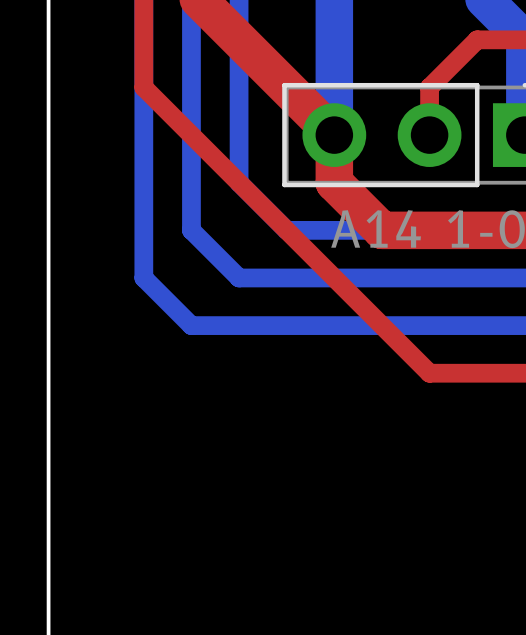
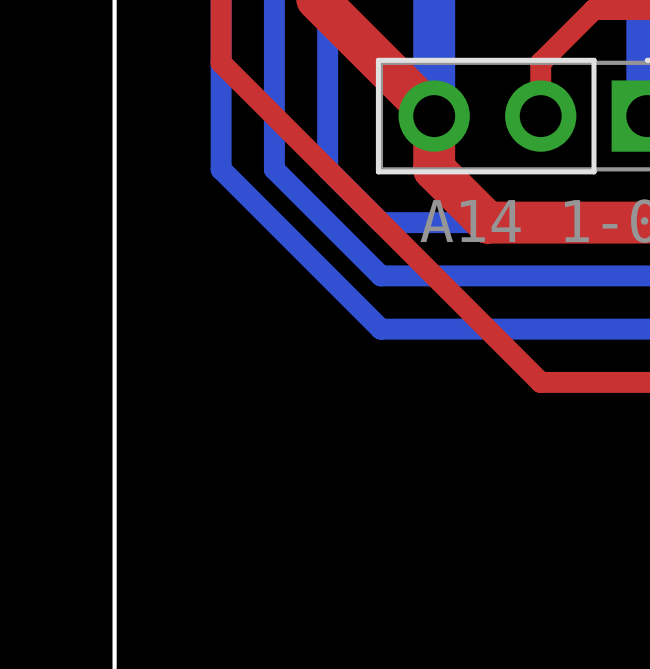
bottom track: (143, 182) (143, 277) (191, 325) (286, 325) -> none
bottom track: (191, 182) (191, 230) -> (221, 169) (274, 222)
bottom track: none -> (274, 169) (380, 275)
bottom track: (239, 277) (286, 277) -> (327, 275) (380, 329)

